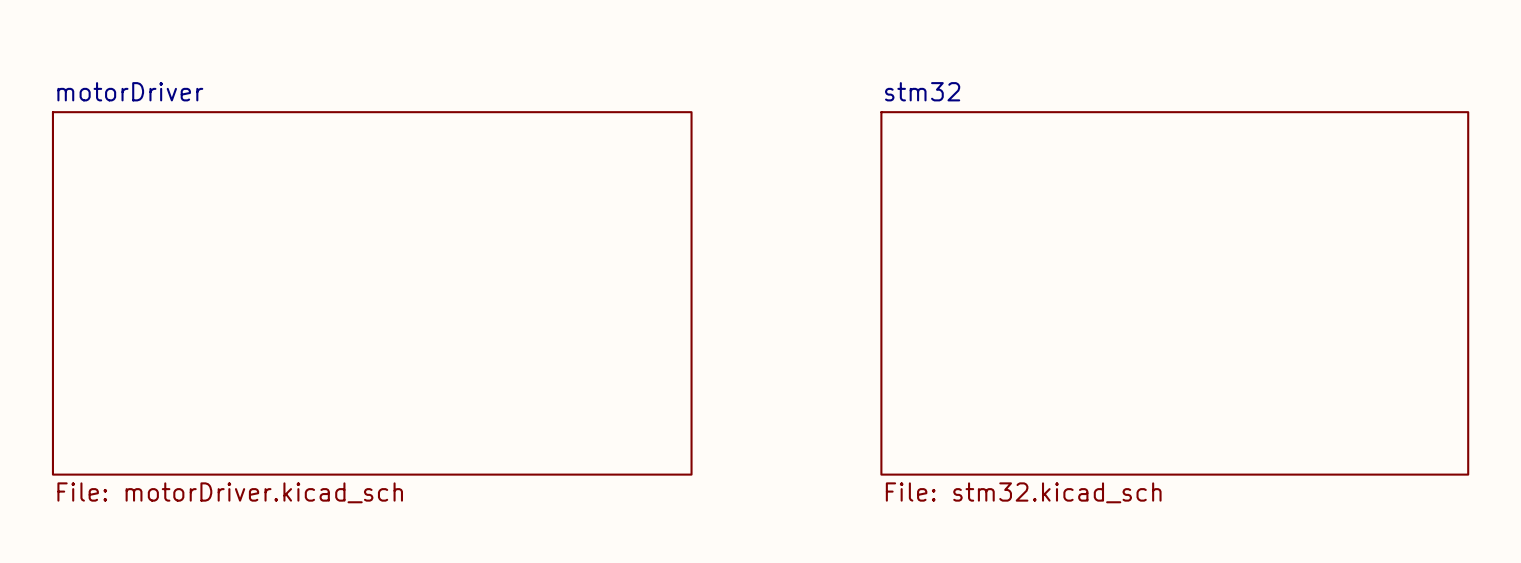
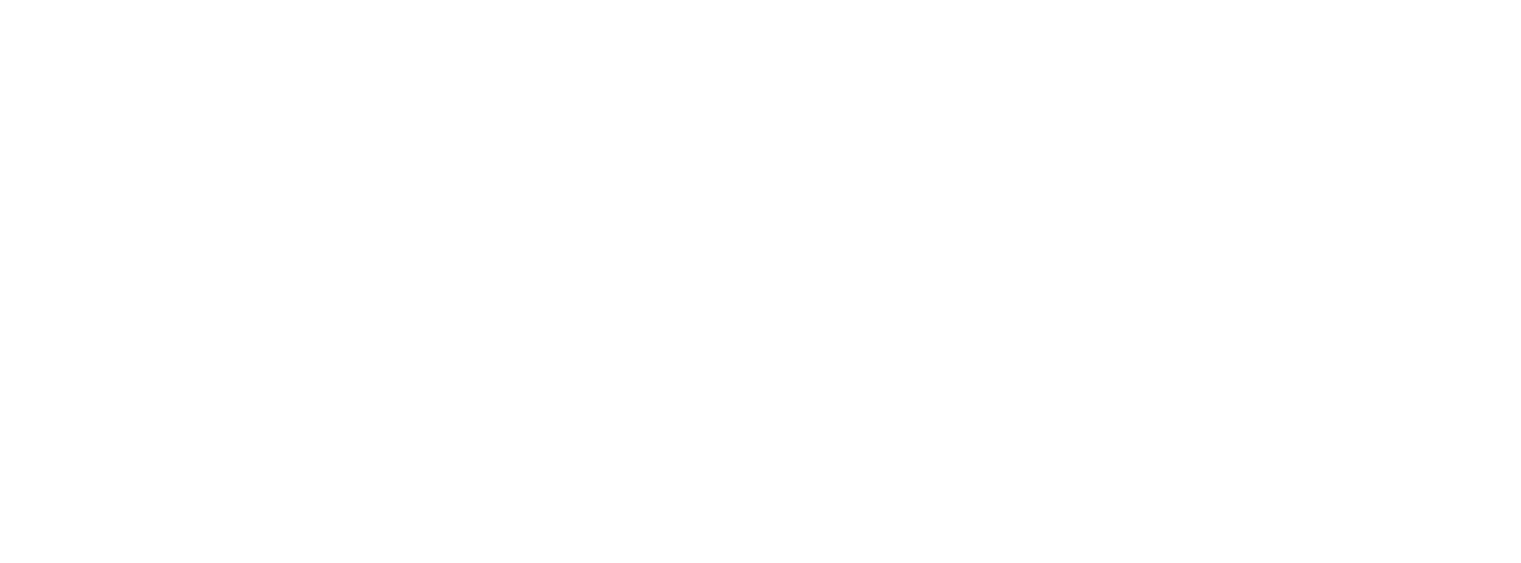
sheet motorDriver: File: motorDriver.kicad_sch (372, 293) -> none
sheet stm32: File: stm32.kicad_sch (1174, 293) -> none

